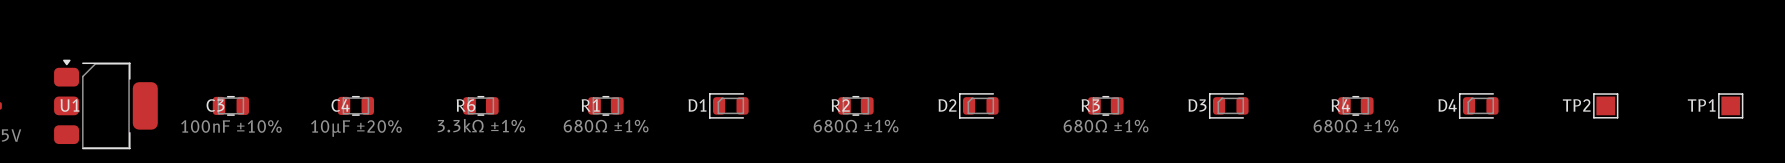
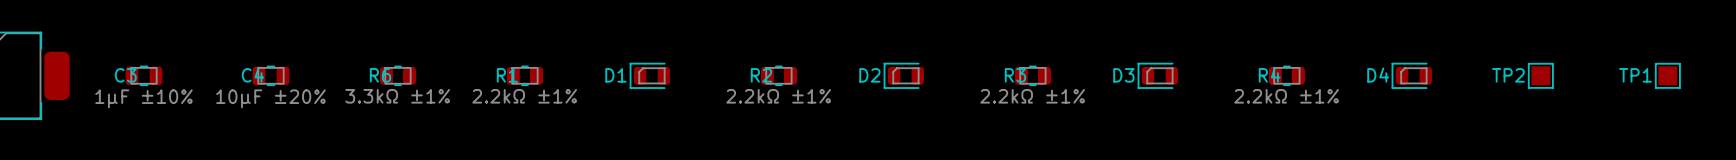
C3 value: 100nF ±10% (231, 126) -> 1µF ±10% (143, 98)
R1 value: 680Ω ±1% (606, 126) -> 2.2kΩ ±1% (524, 96)
R2 value: 680Ω ±1% (856, 126) -> 2.2kΩ ±1% (778, 96)
R3 value: 680Ω ±1% (1106, 126) -> 2.2kΩ ±1% (1032, 96)
R4 value: 680Ω ±1% (1356, 126) -> 2.2kΩ ±1% (1286, 96)

